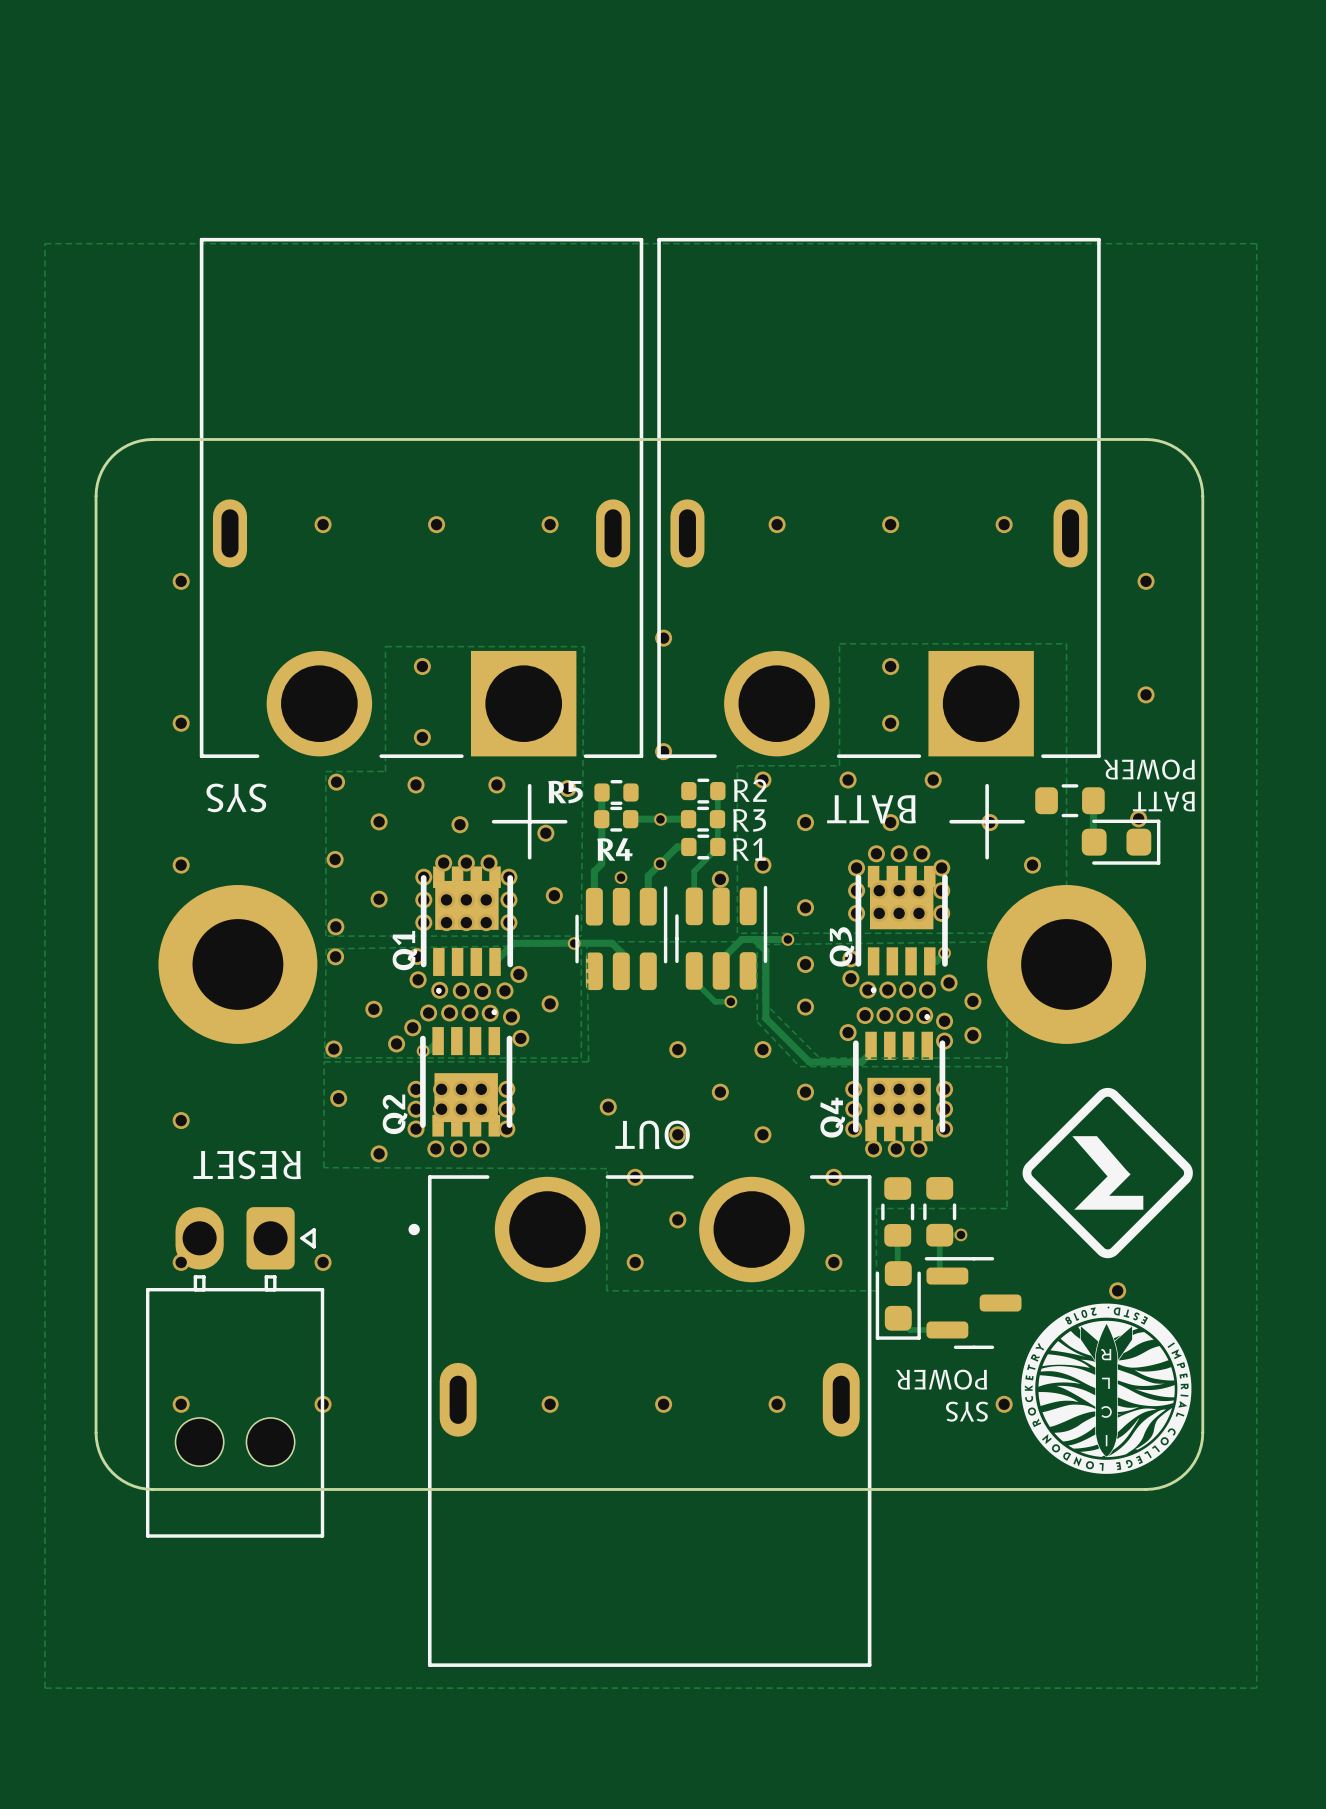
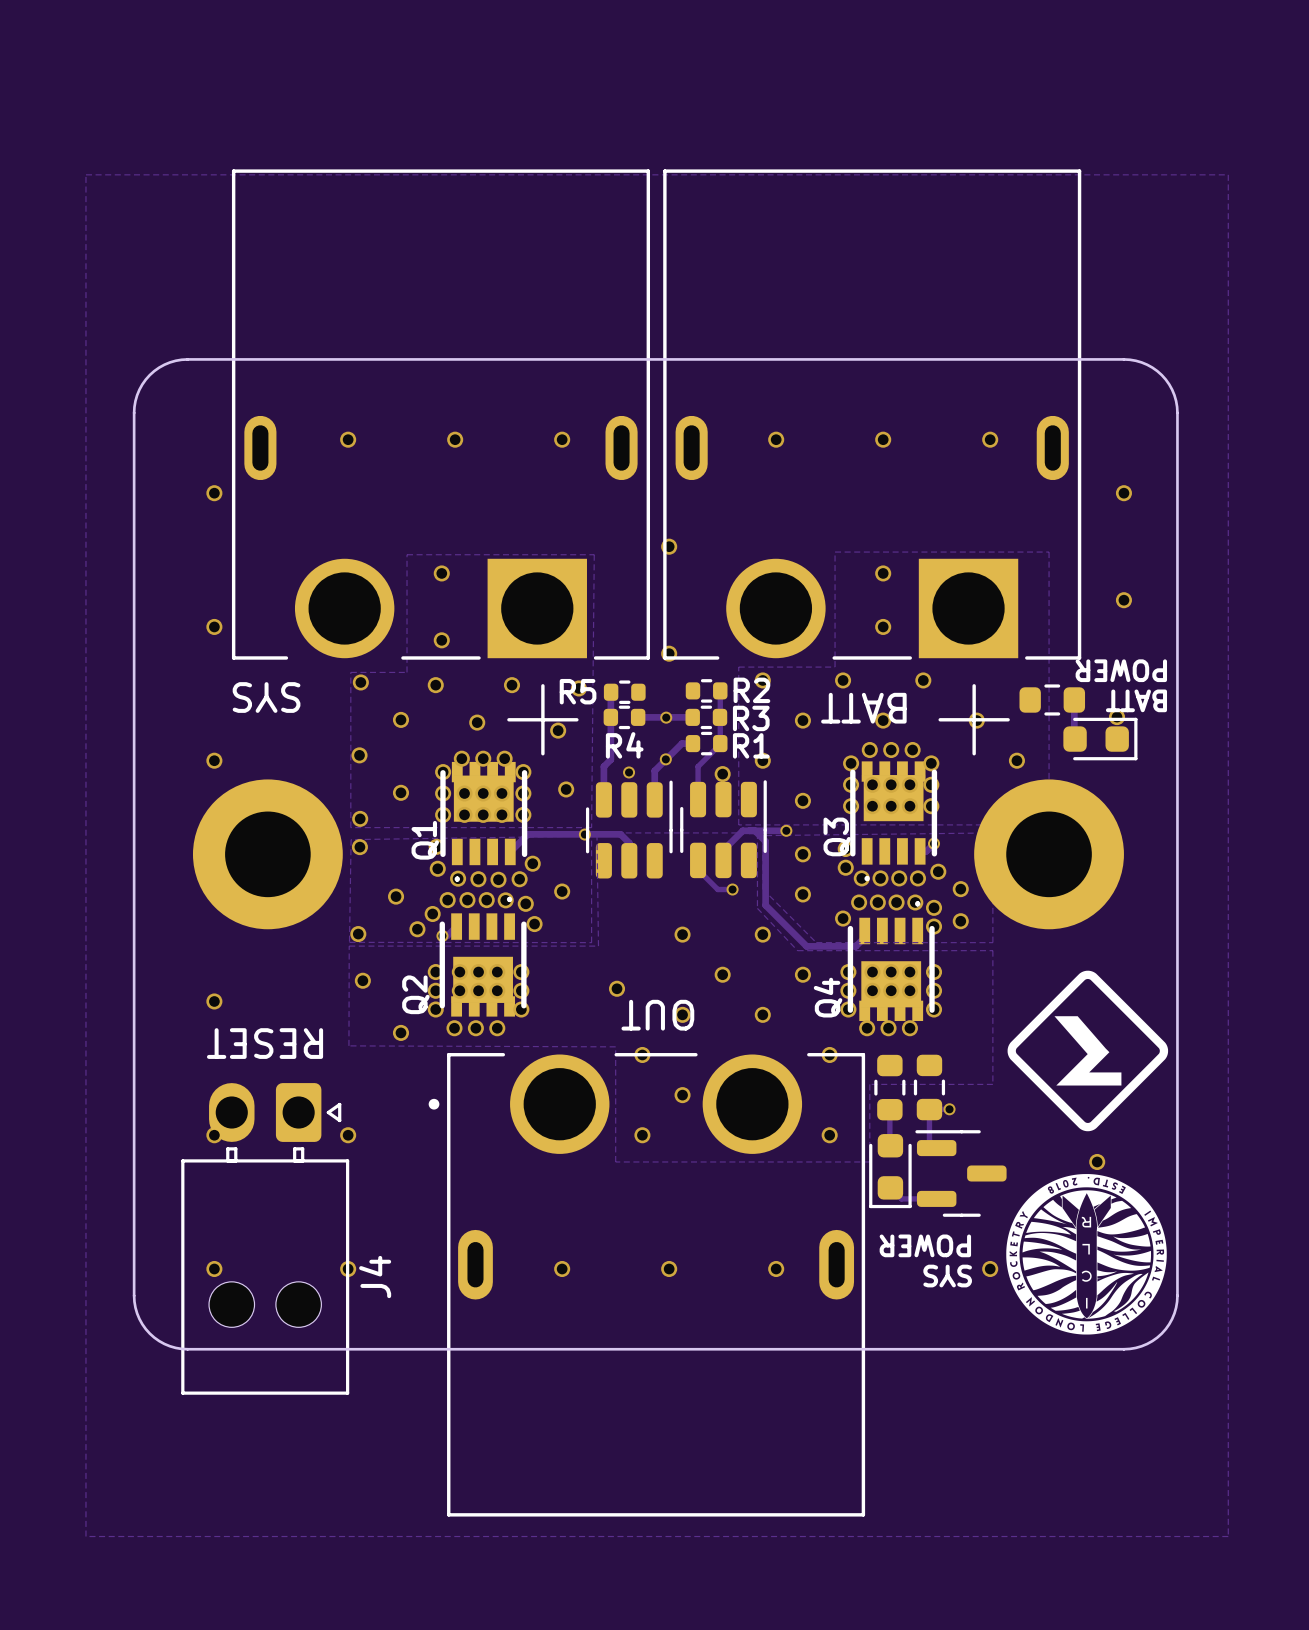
J4 name: none -> J4 (375, 1277)

